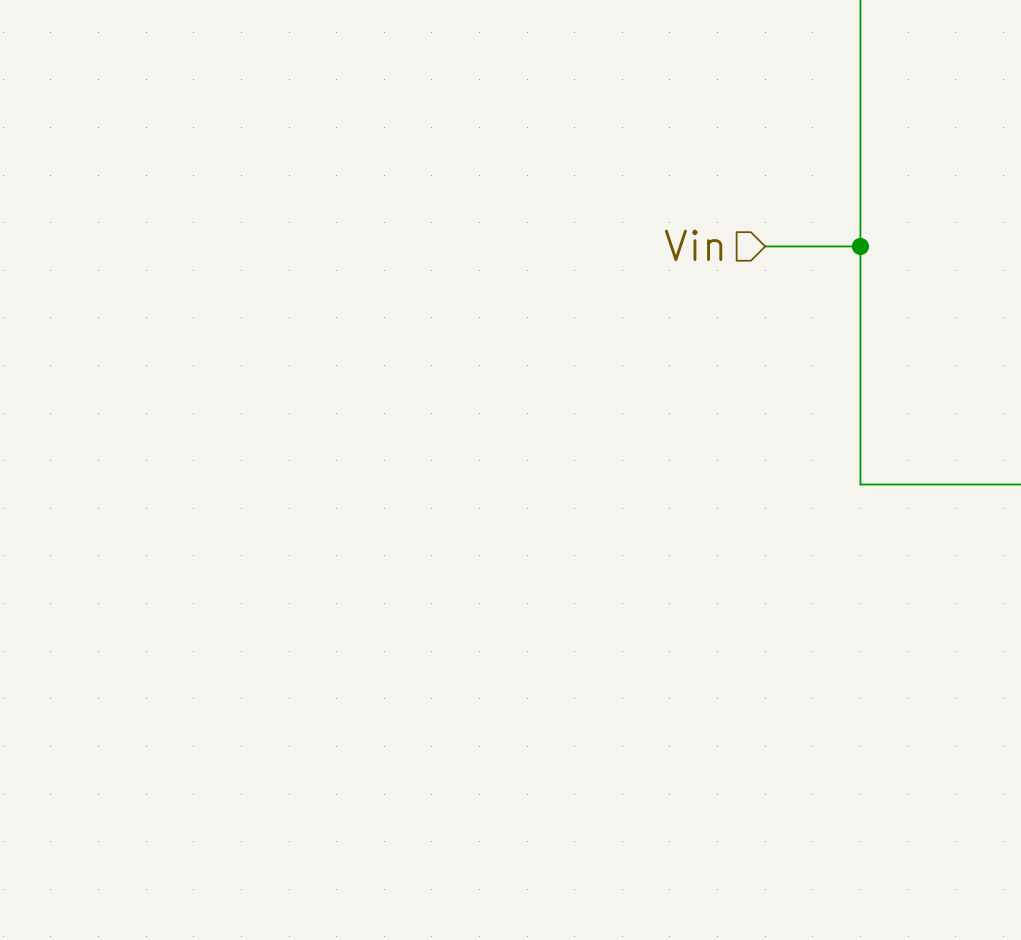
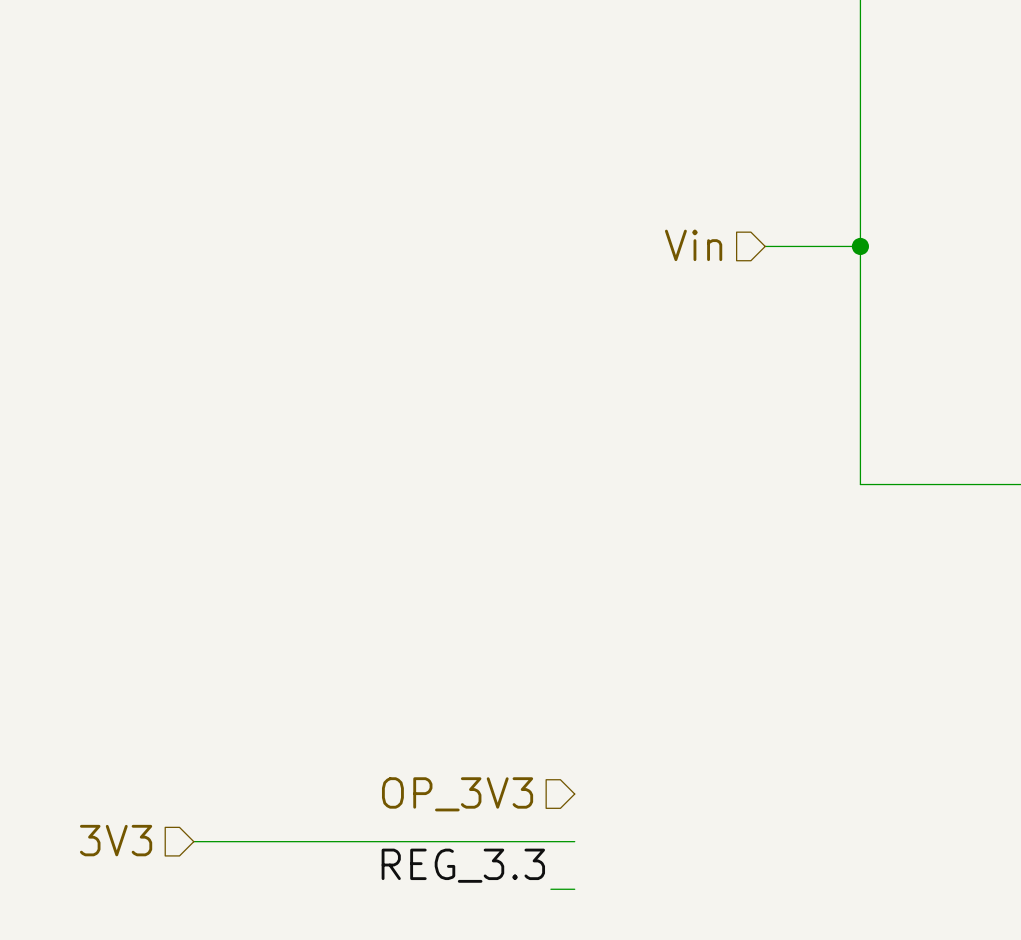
hierarchical label: none -> OP_3V3 (457, 794)
hierarchical label: none -> 3V3 (116, 840)
wire: none -> (193, 841) (574, 841)
label: none -> REG_3.3 (463, 865)
wire: none -> (550, 889) (574, 889)

